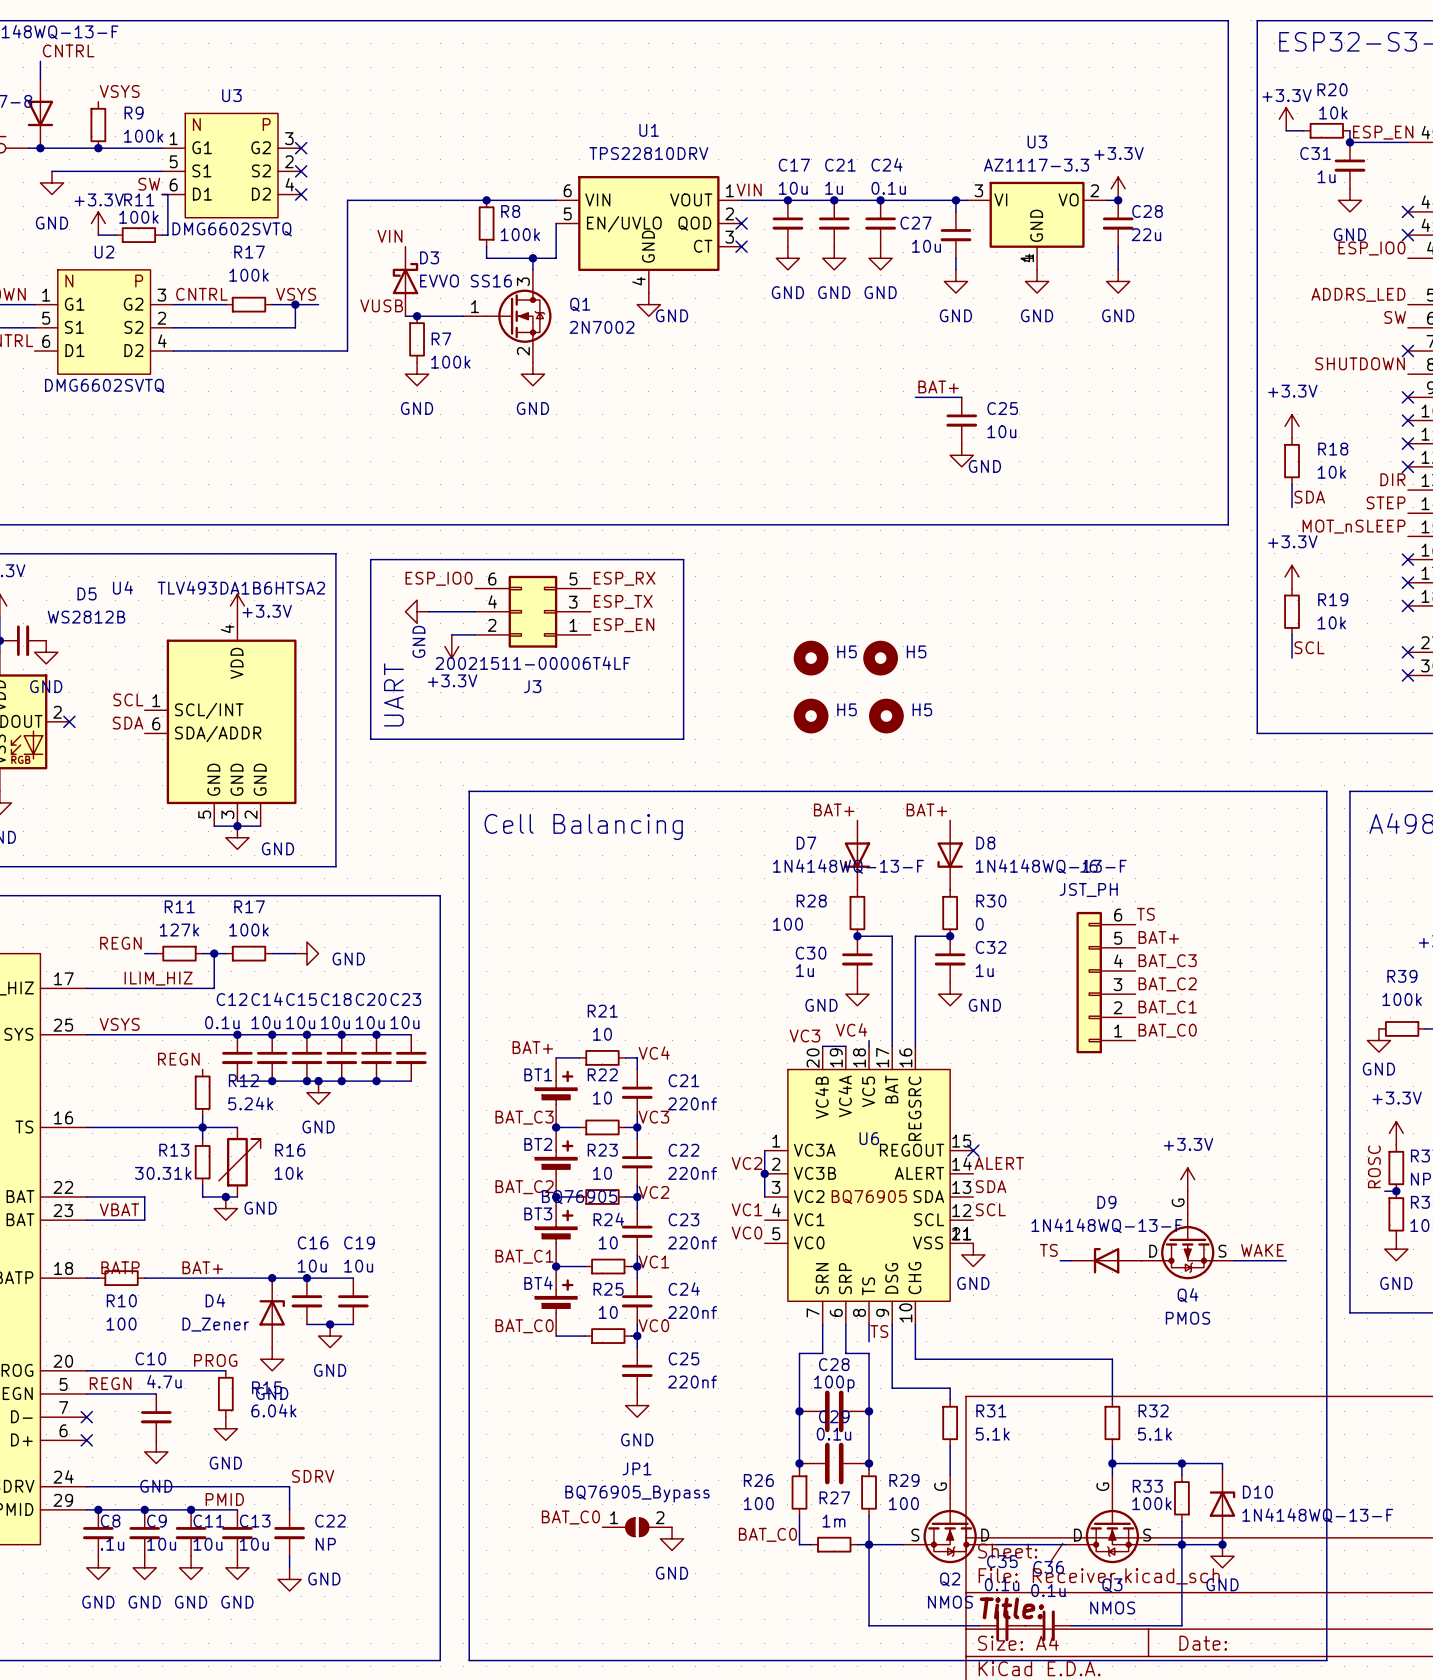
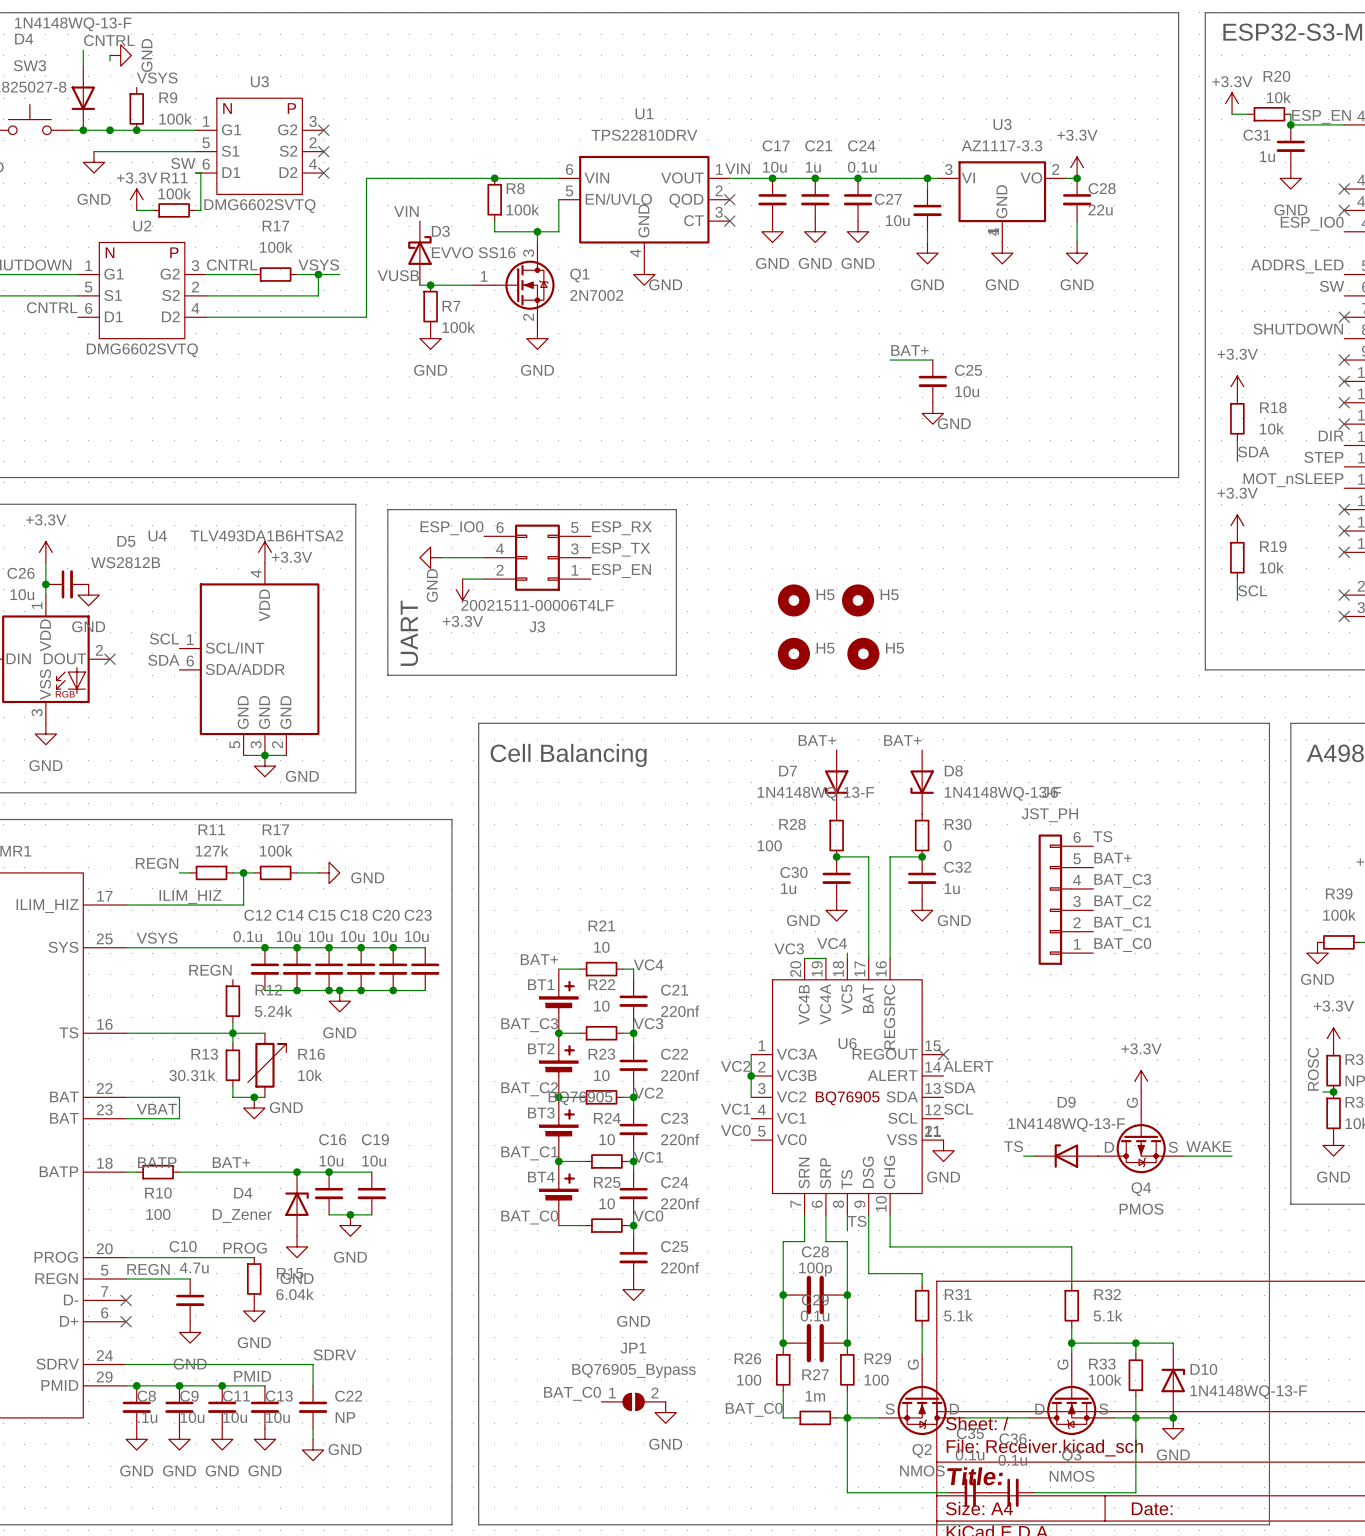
wire: none -> (110, 55) (110, 60)
power symbol: none -> GND (120, 55)
junction: none -> (110, 130)

